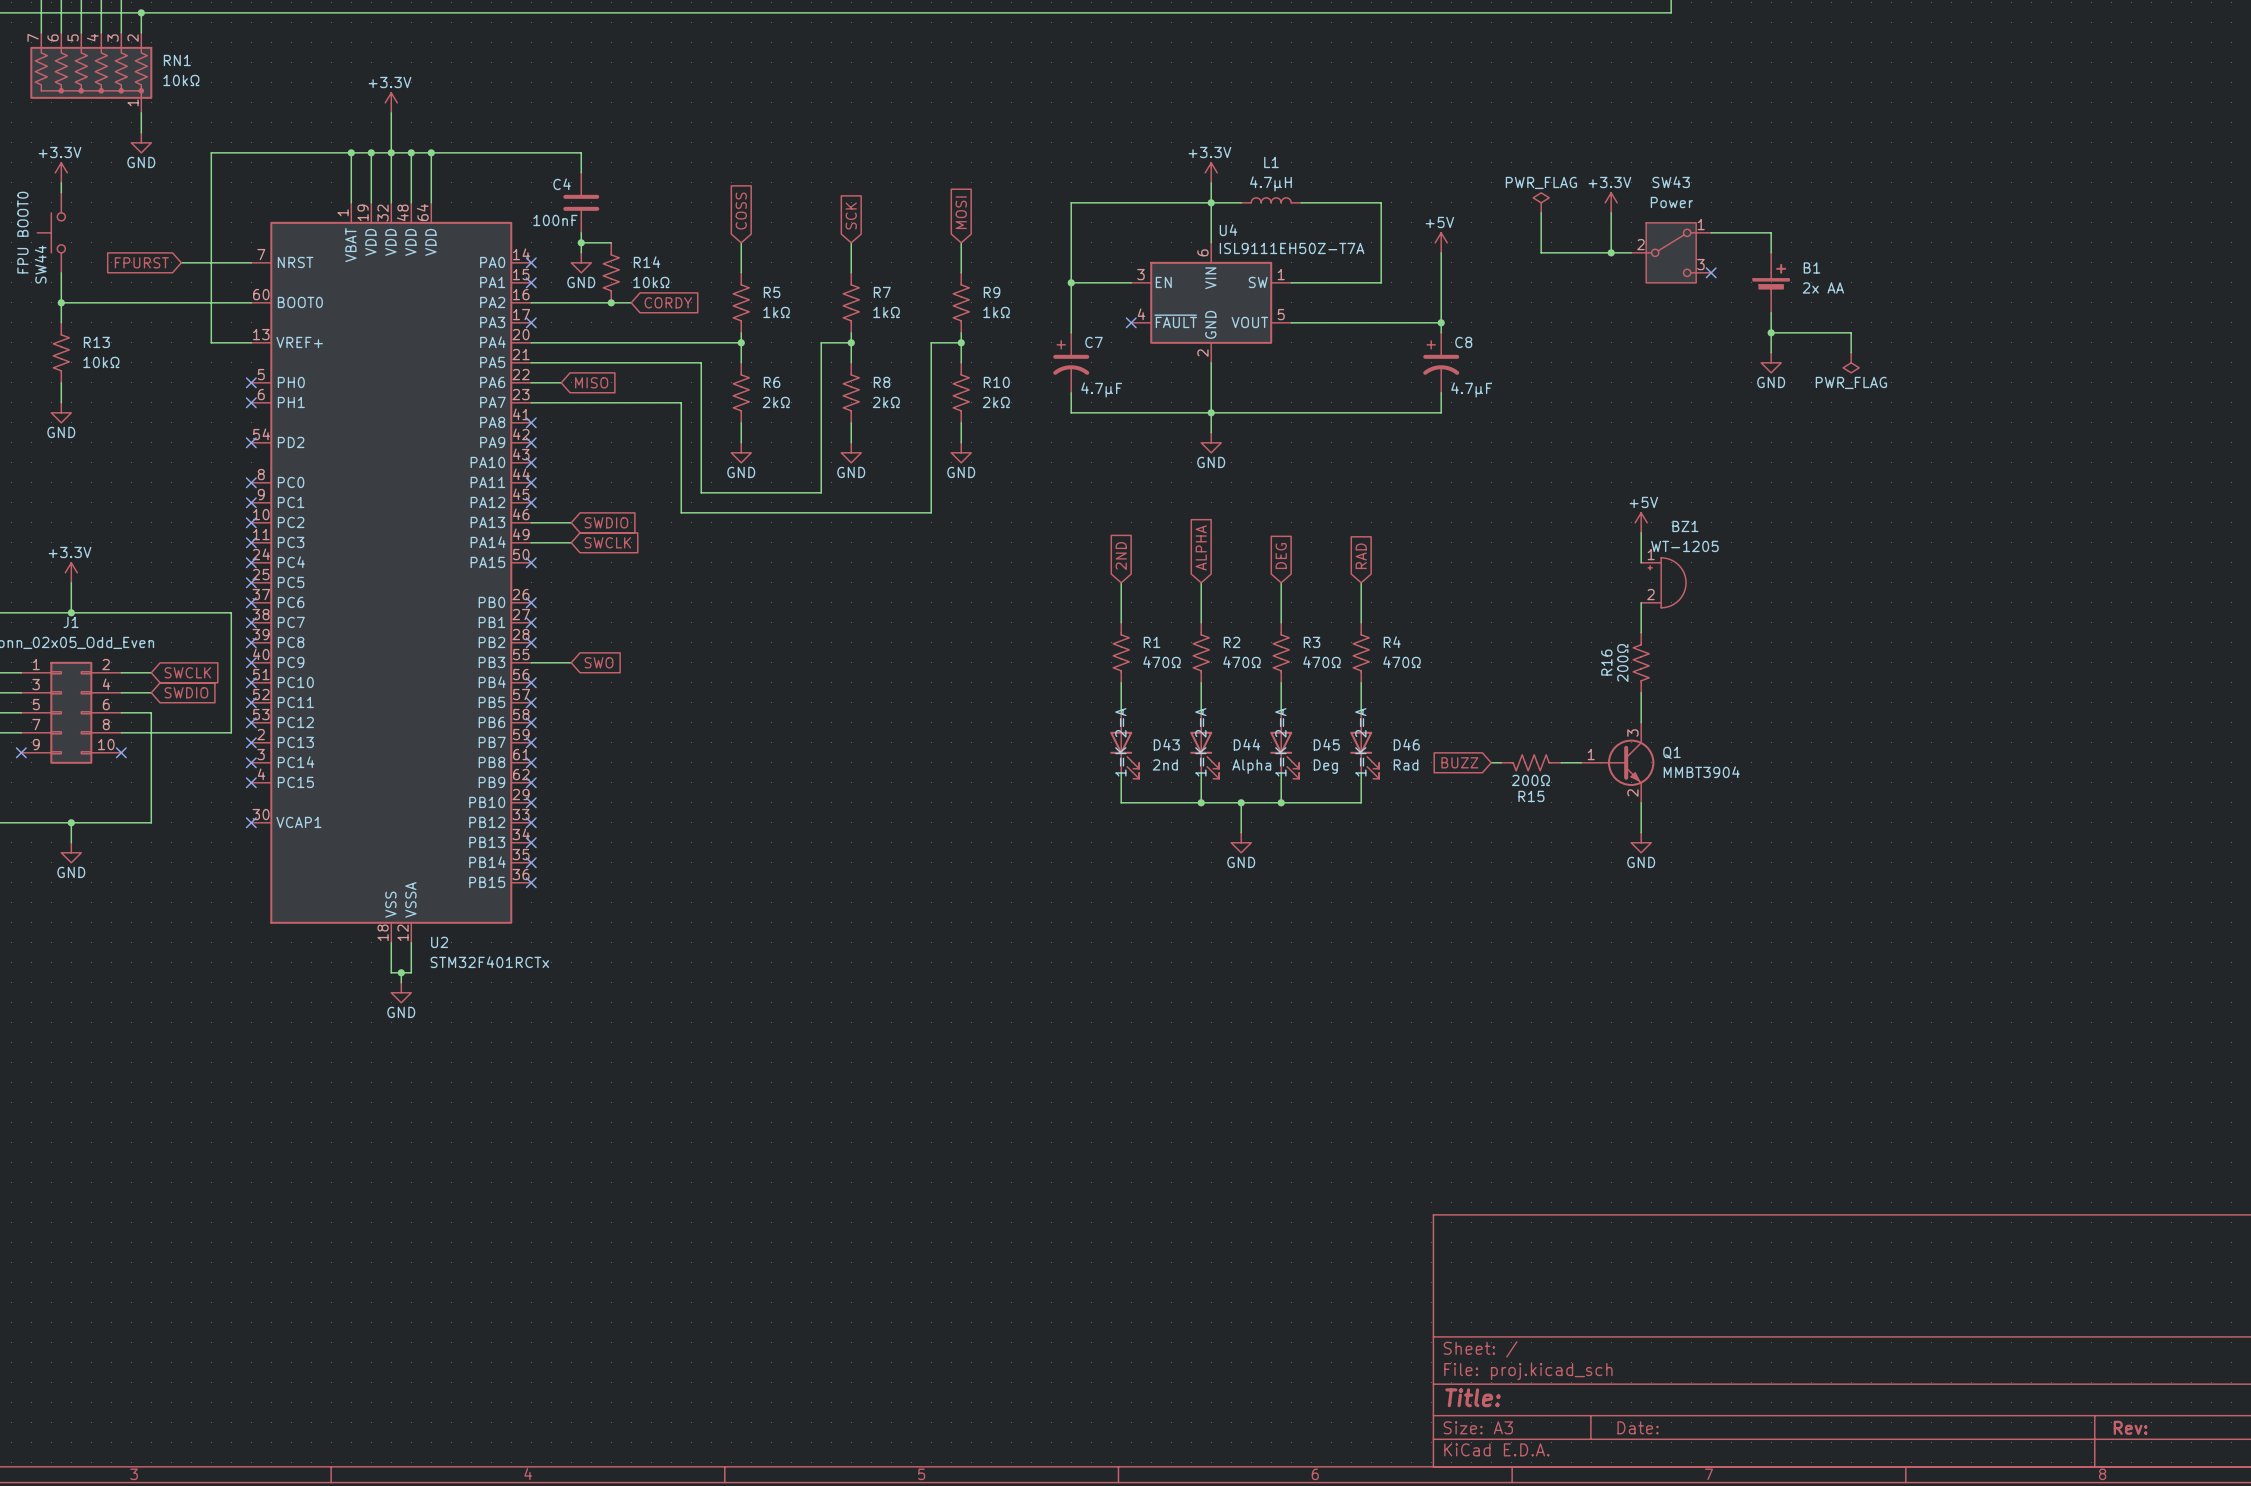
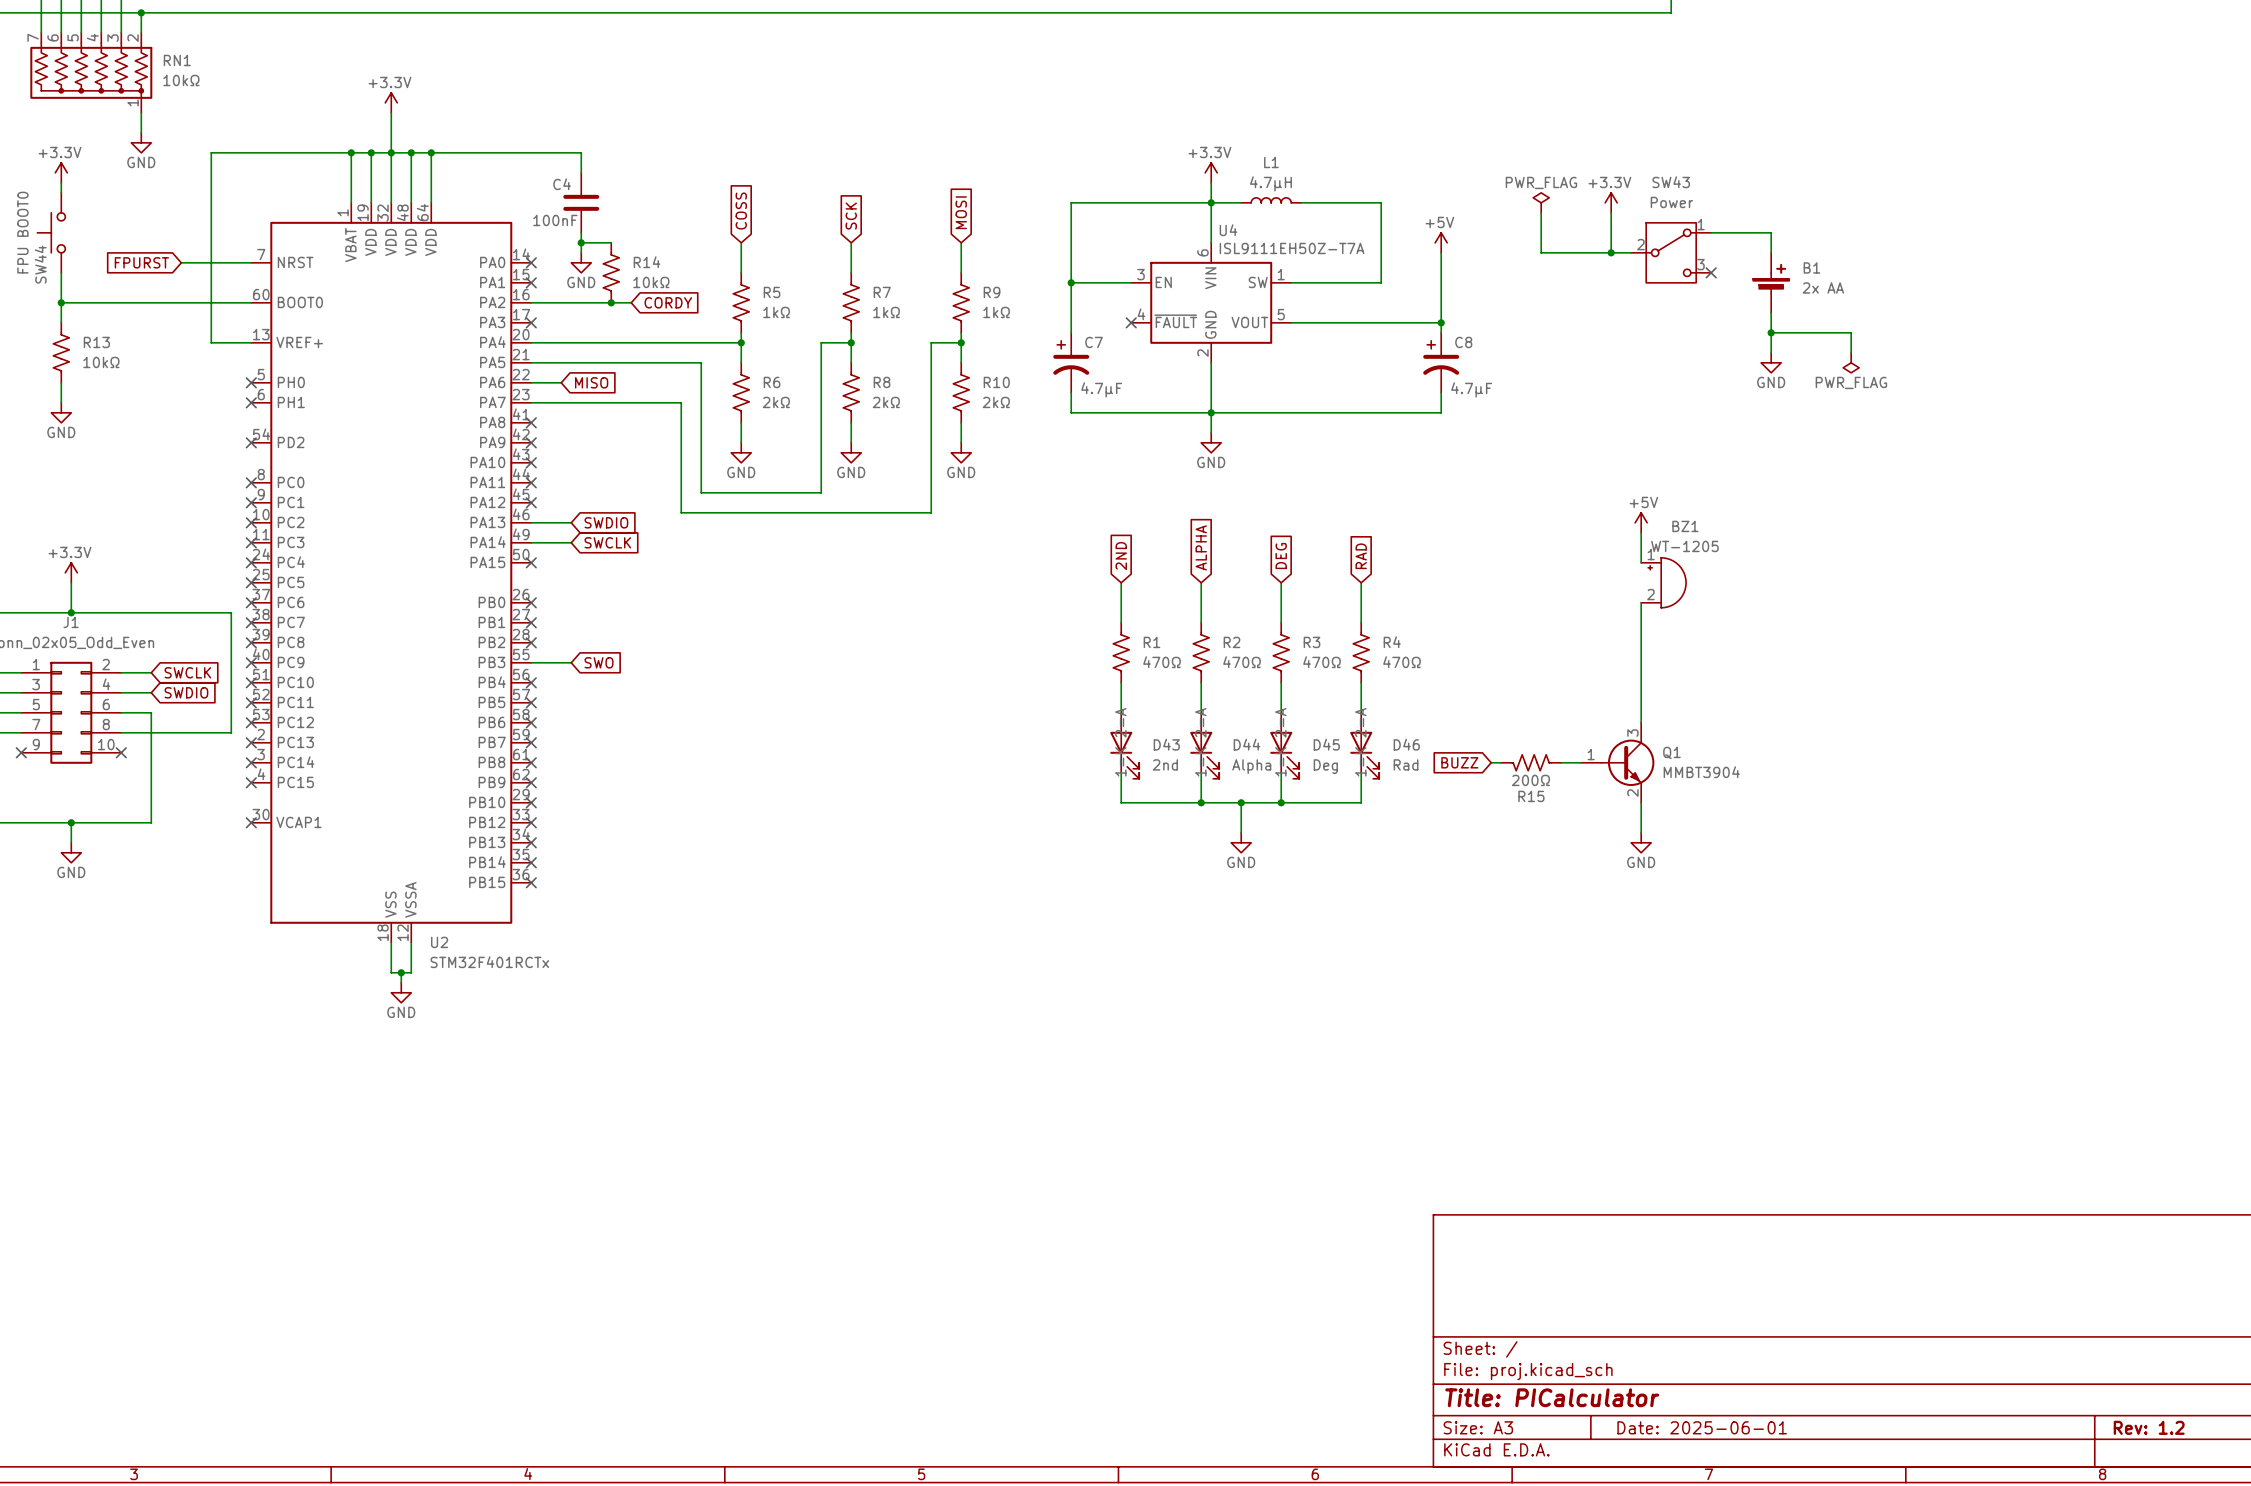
R16: 200Ω (1641, 662) -> none
title block: Title: (1473, 1397) -> Title: PICalculator (1552, 1397)
title block: Date: (1638, 1427) -> Date: 2025-06-01 (1702, 1427)
title block: Rev: (2130, 1427) -> Rev: 1.2 (2149, 1427)

